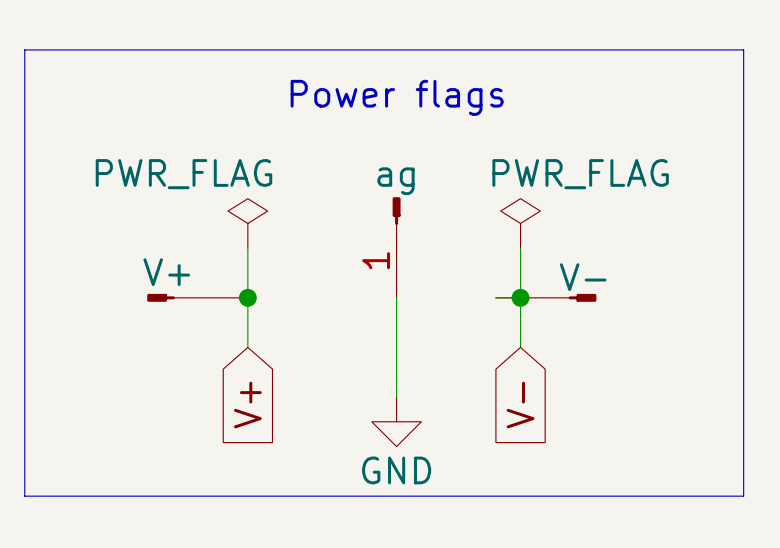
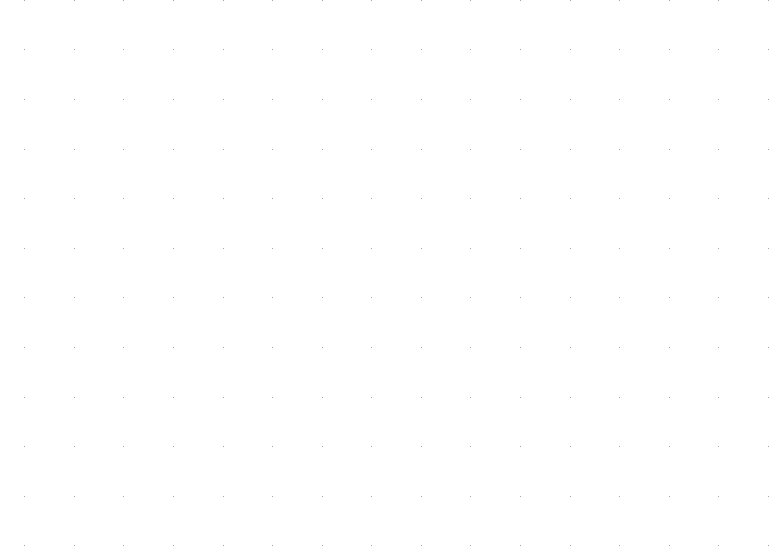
line: (24, 49) (743, 49) (743, 496) (24, 496) (24, 49) -> none
text: Power flags (397, 97) -> none
power symbol: PWR_FLAG (247, 223) -> none
power symbol: PWR_FLAG (520, 223) -> none
ag: (396, 247) -> none
wire: (247, 248) (247, 347) -> none
wire: (520, 248) (520, 347) -> none
V+: (197, 297) -> none
junction: (247, 297) -> none
wire: (396, 297) (396, 397) -> none
wire: (495, 297) (520, 297) -> none
junction: (520, 297) -> none
V-: (546, 297) -> none
global label: V+ (247, 405) -> none
global label: V- (520, 405) -> none
power symbol: GND (396, 421) -> none

